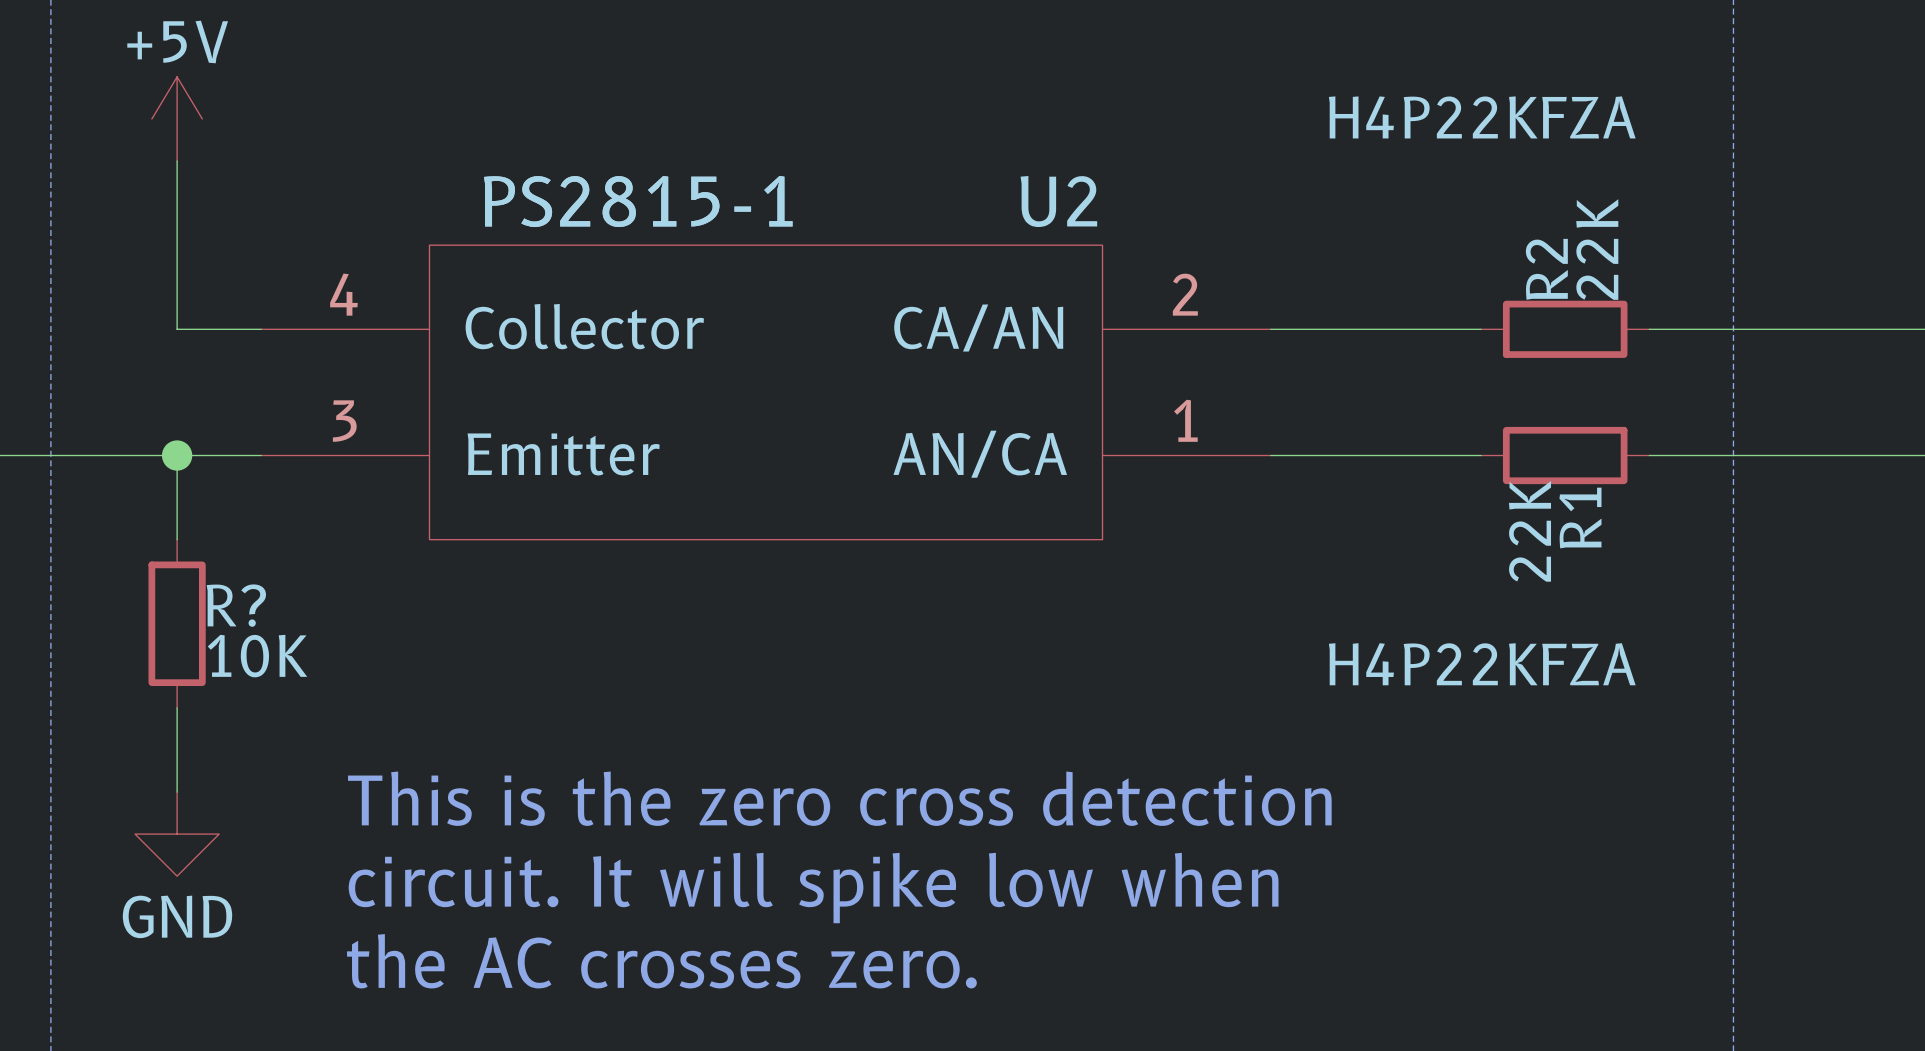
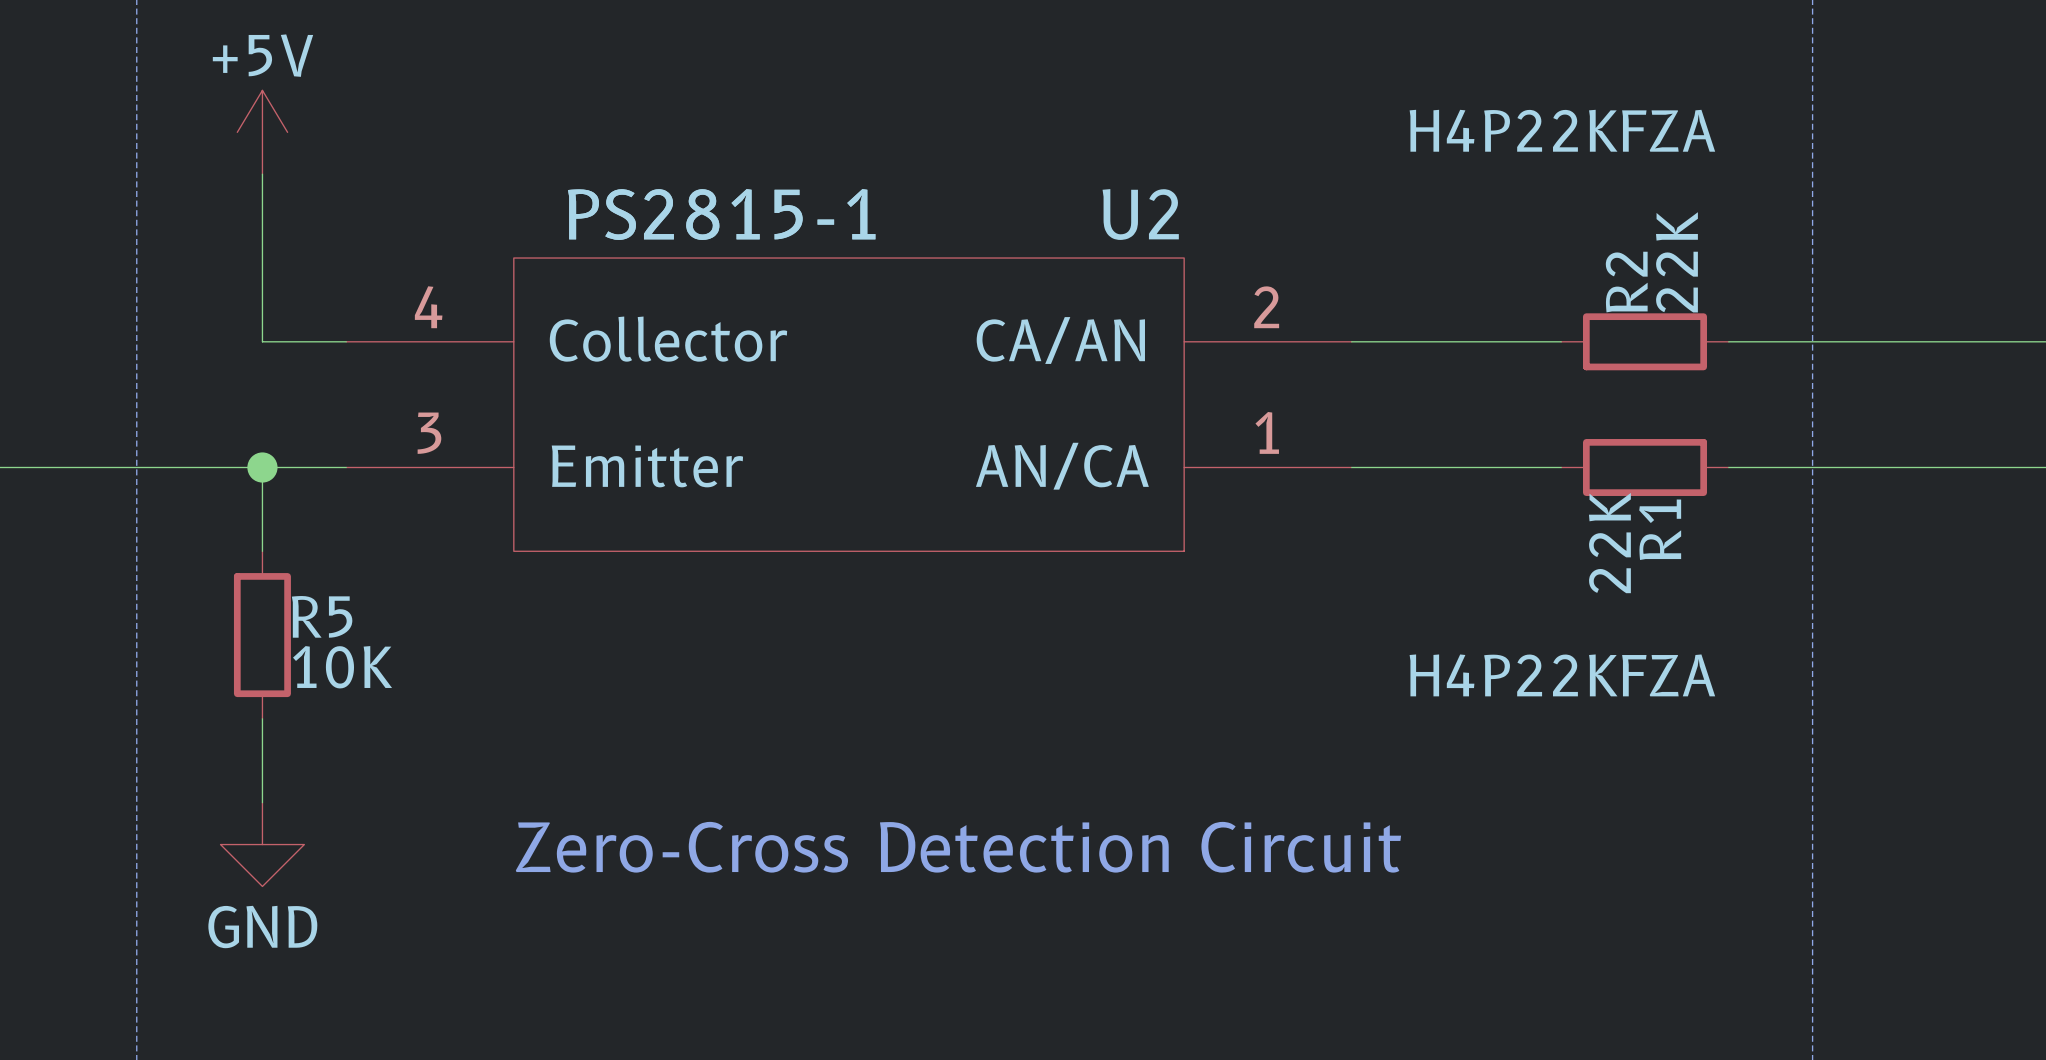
R? name: R? (236, 605) -> R5 (322, 616)
text: This is the zero cross detection (839, 798) -> none
text: none -> Zero-Cross Detection Circuit (958, 847)
text: circuit. It will spike low when (813, 888) -> none
text: the AC crosses zero. (661, 961) -> none

